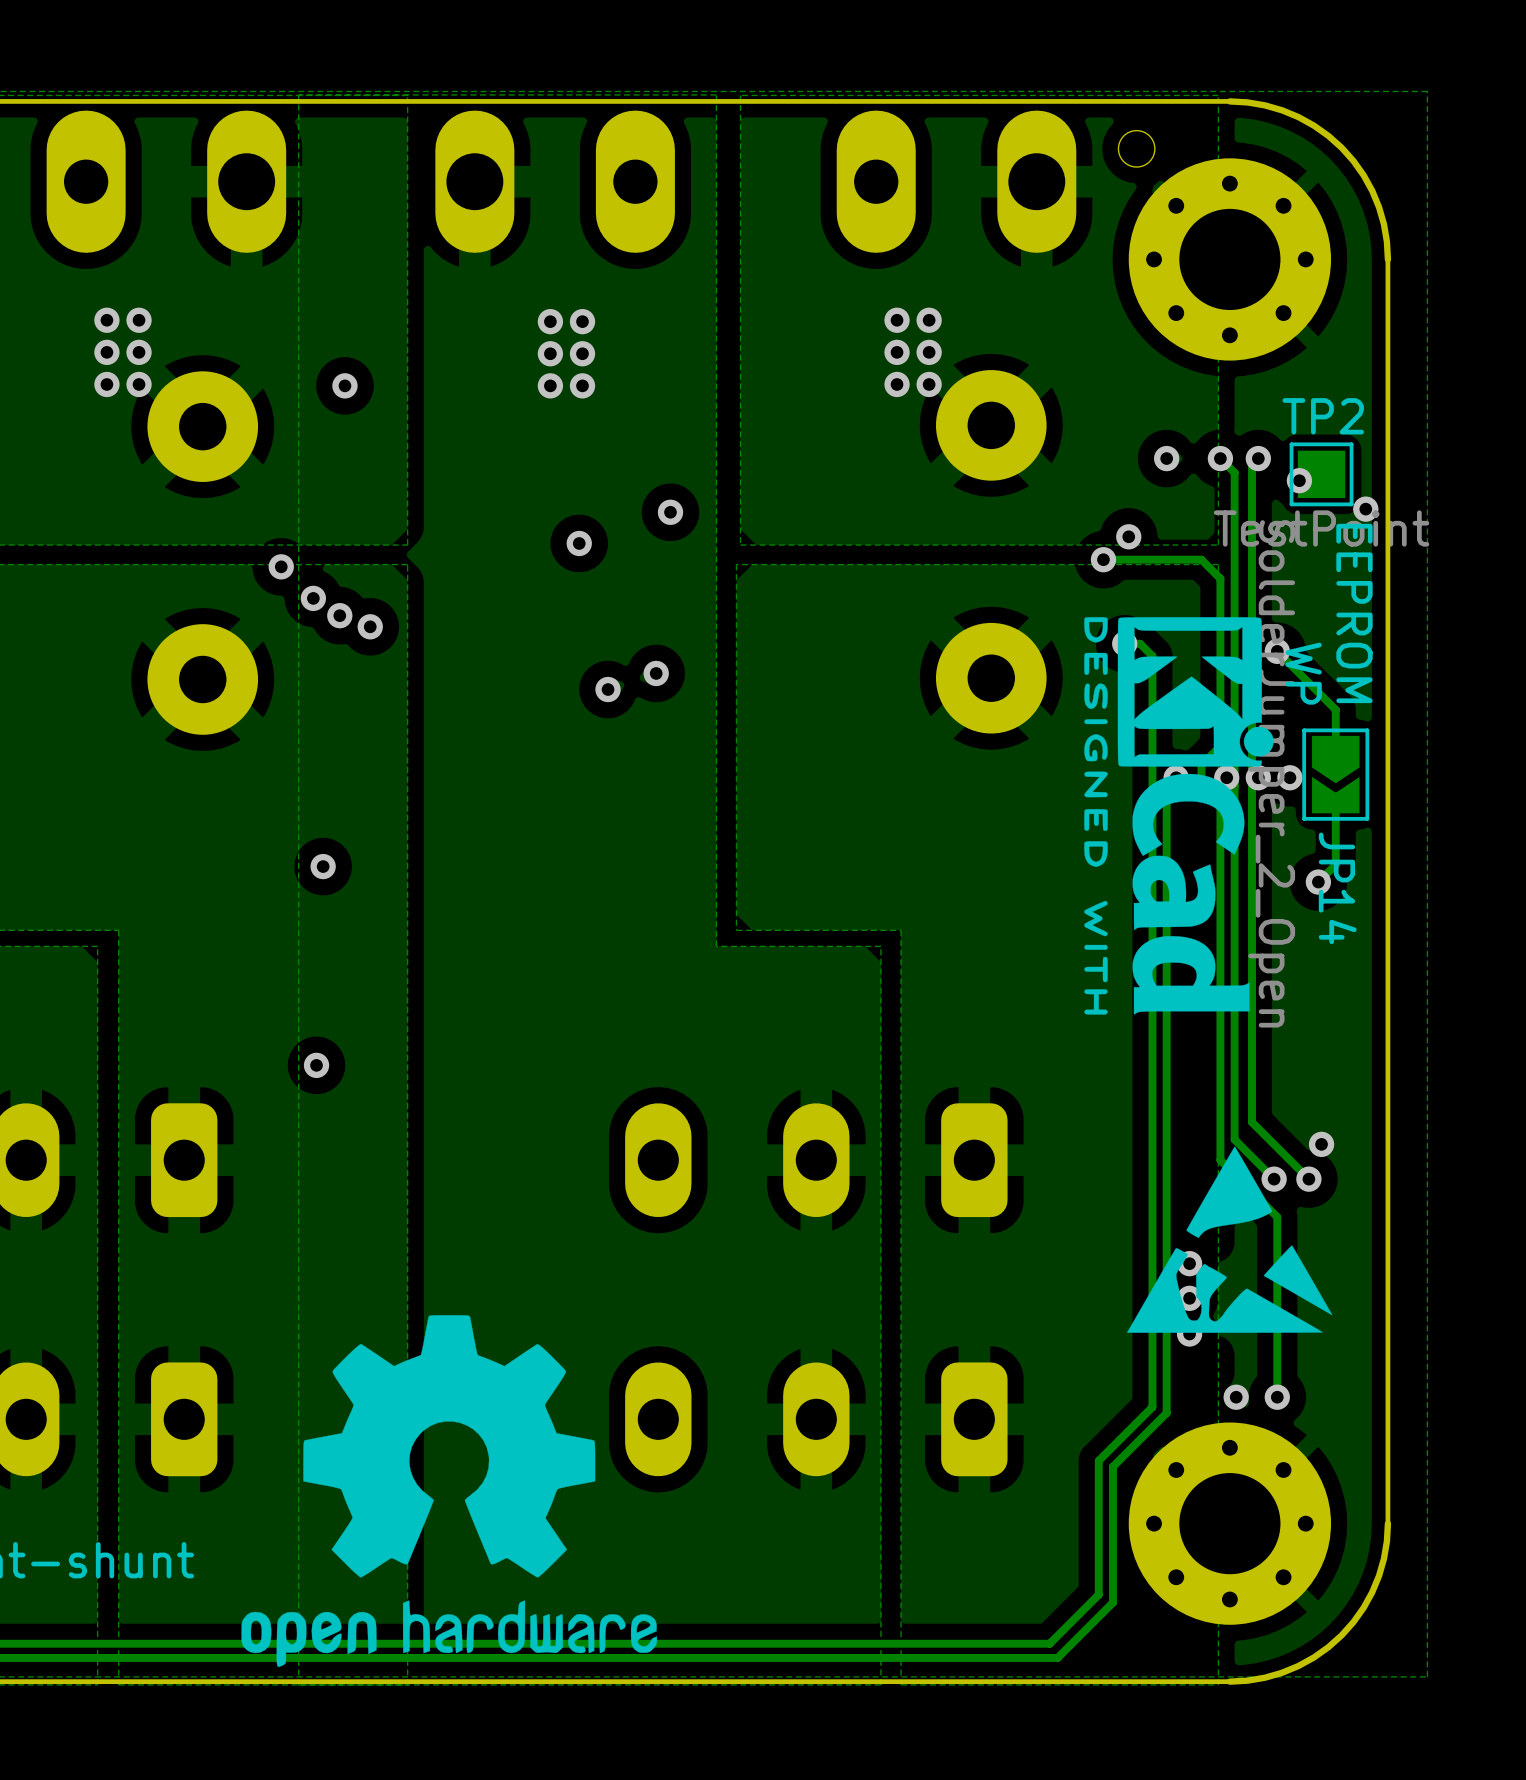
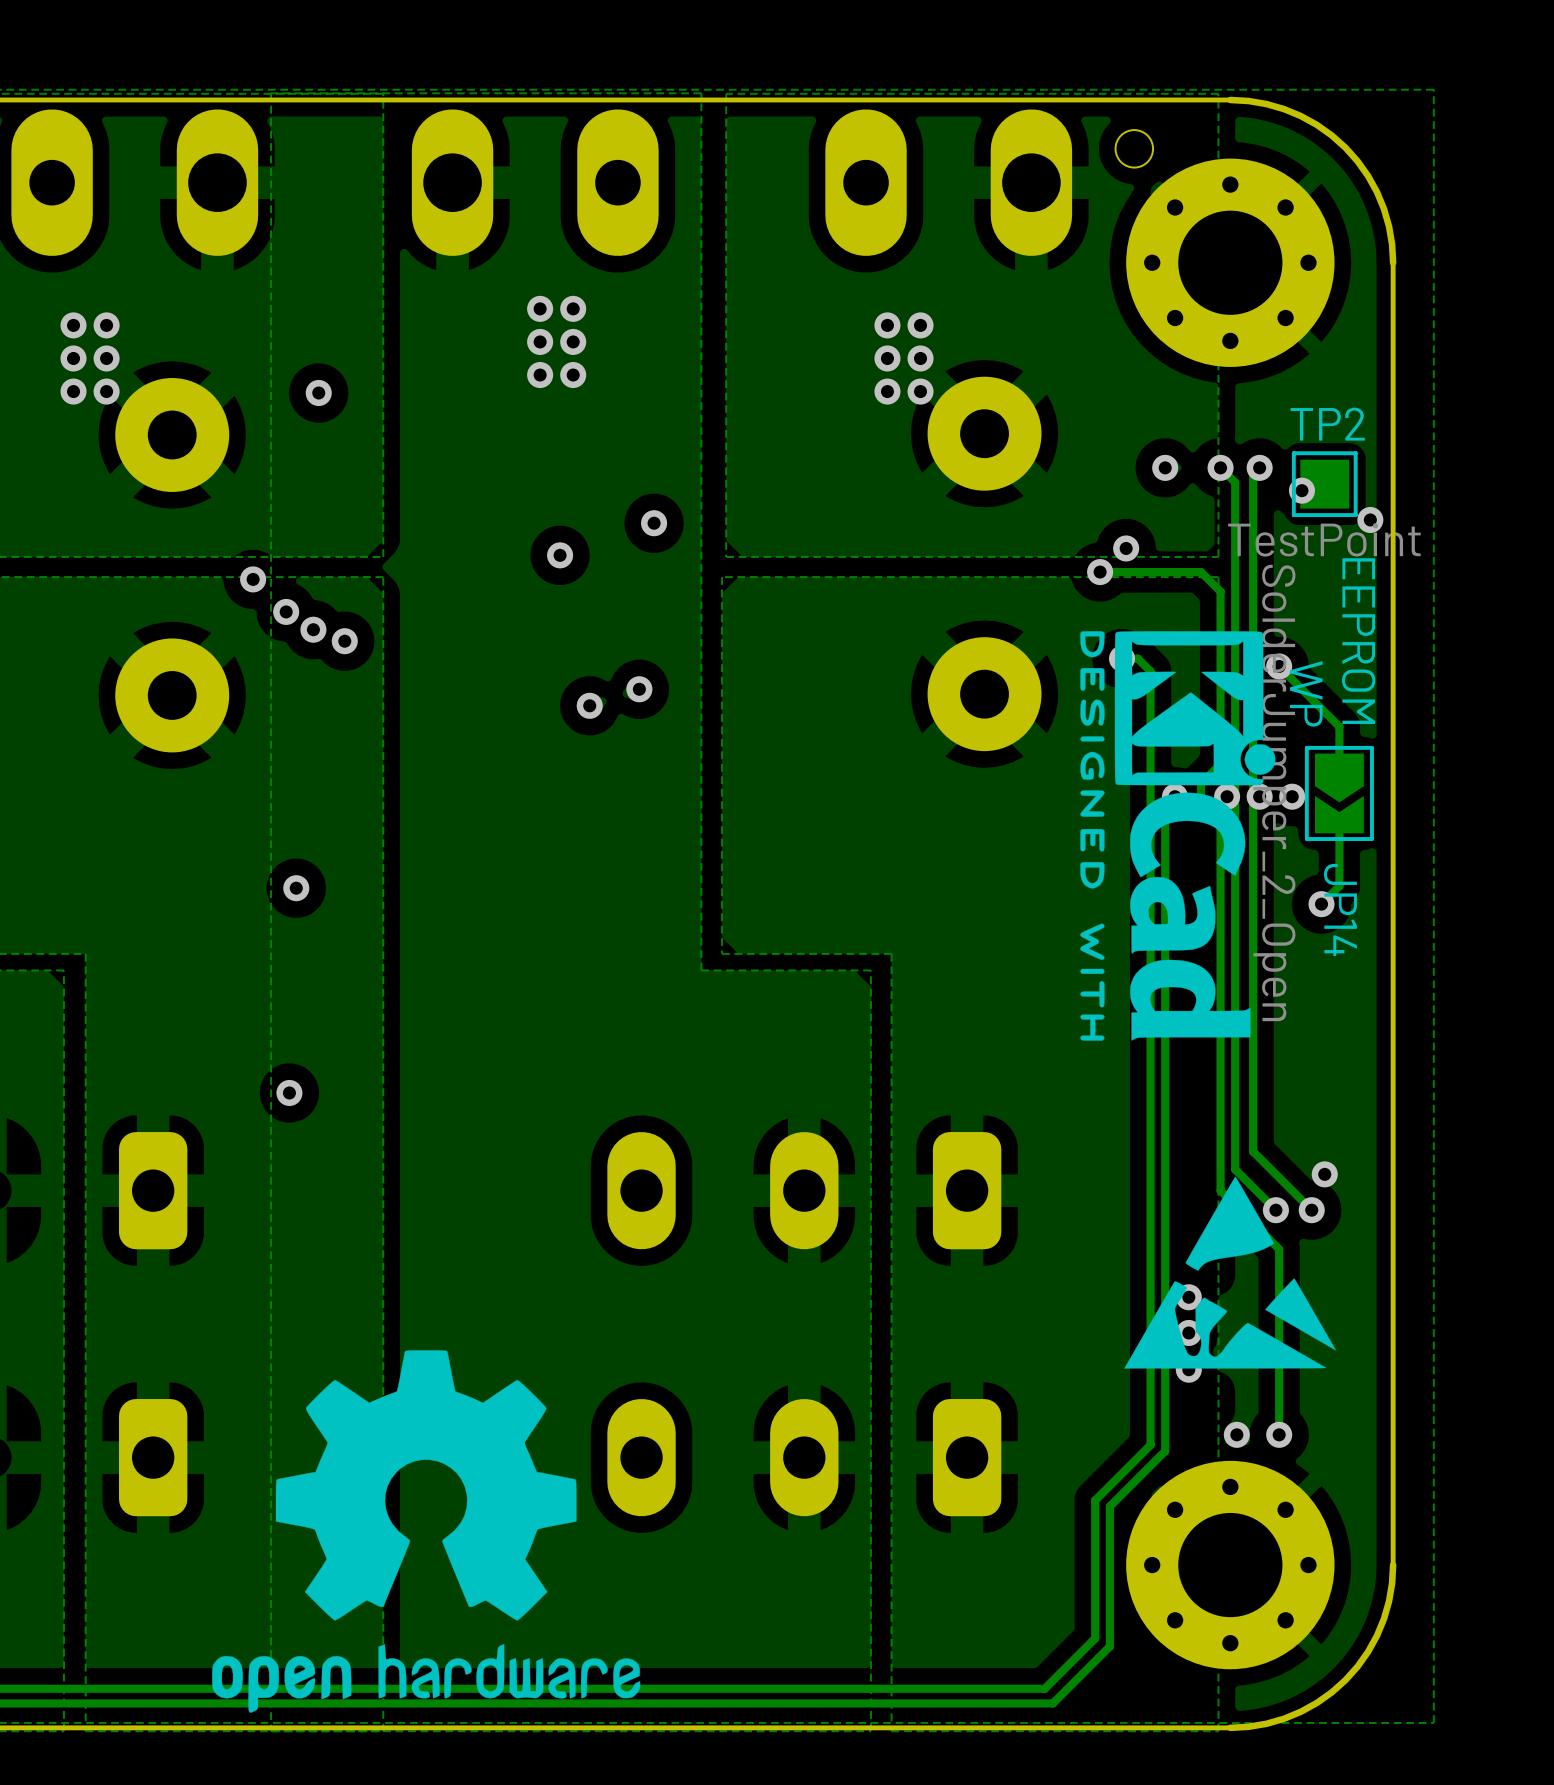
via: none -> (540, 308)
via: none -> (573, 308)
via: (550, 321) -> none
via: (582, 321) -> none
via: none -> (540, 341)
via: none -> (573, 341)
via: (550, 353) -> none
via: (582, 353) -> none
via: none -> (540, 375)
via: none -> (573, 375)
via: (550, 385) -> none
via: (582, 385) -> none

